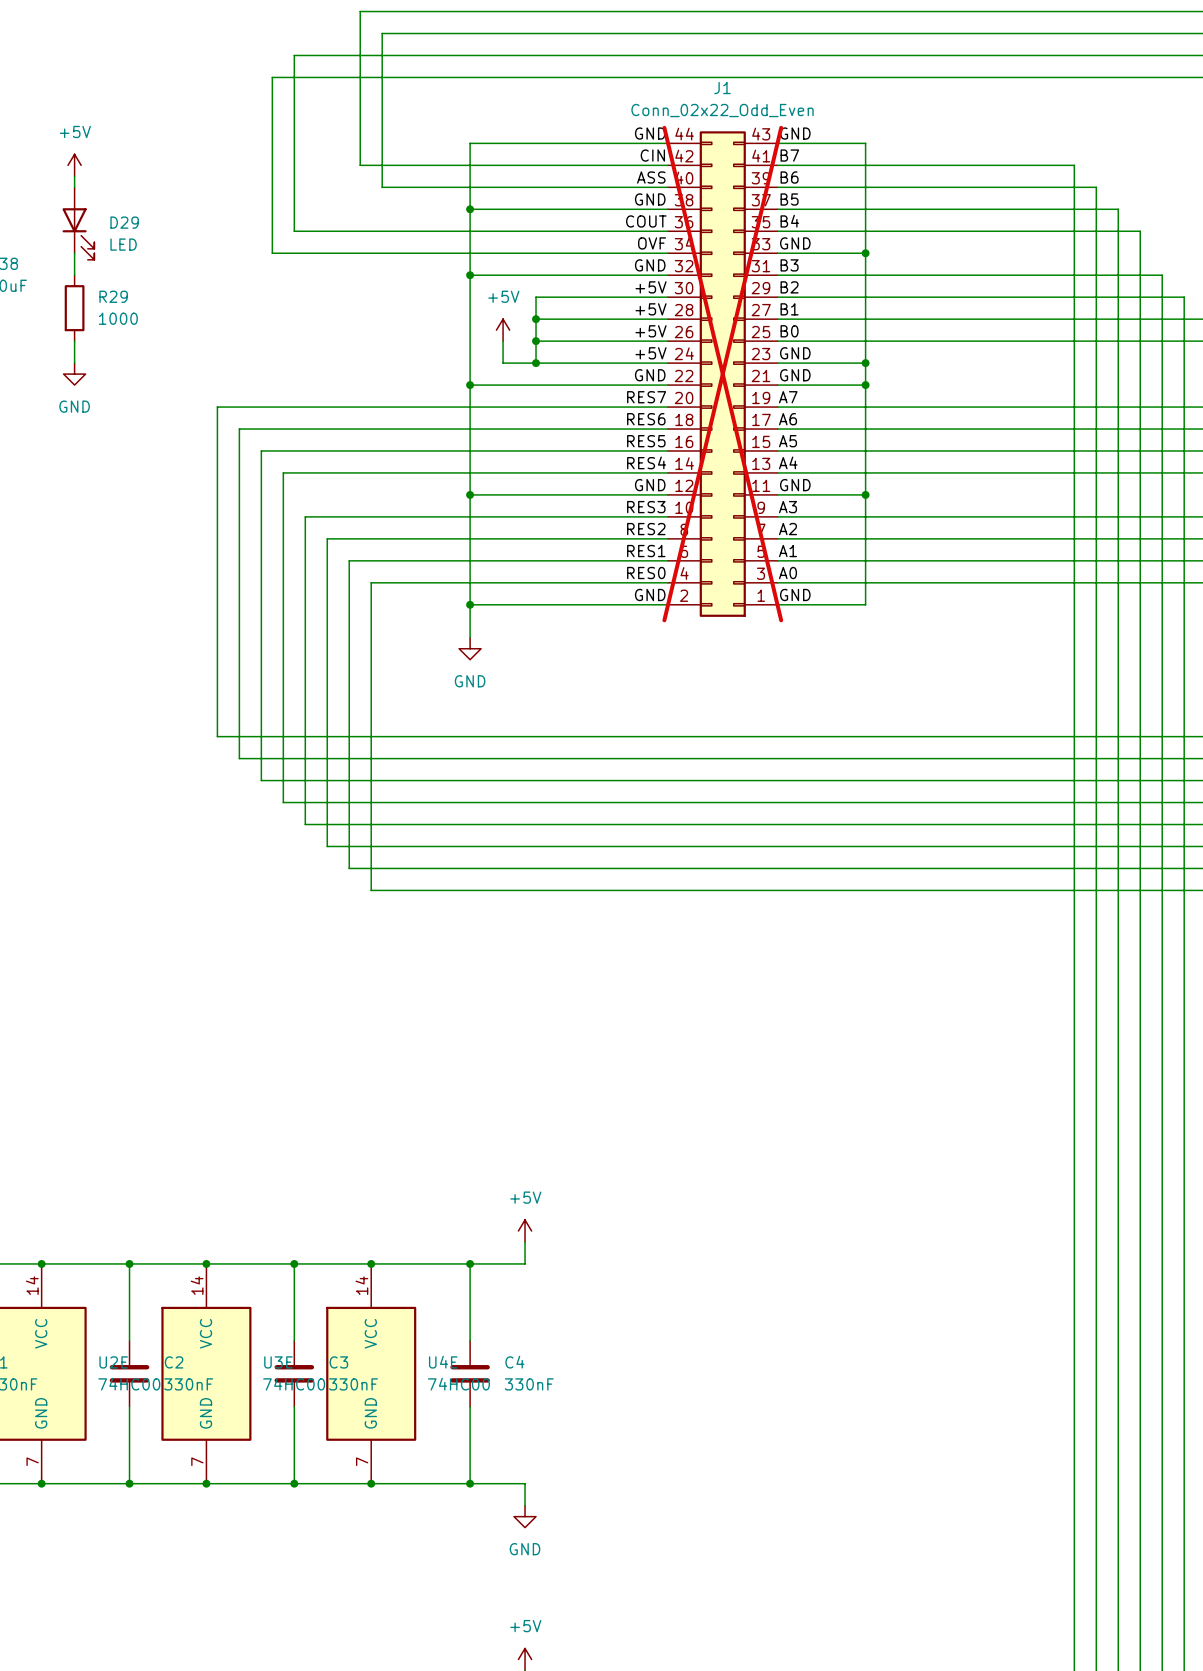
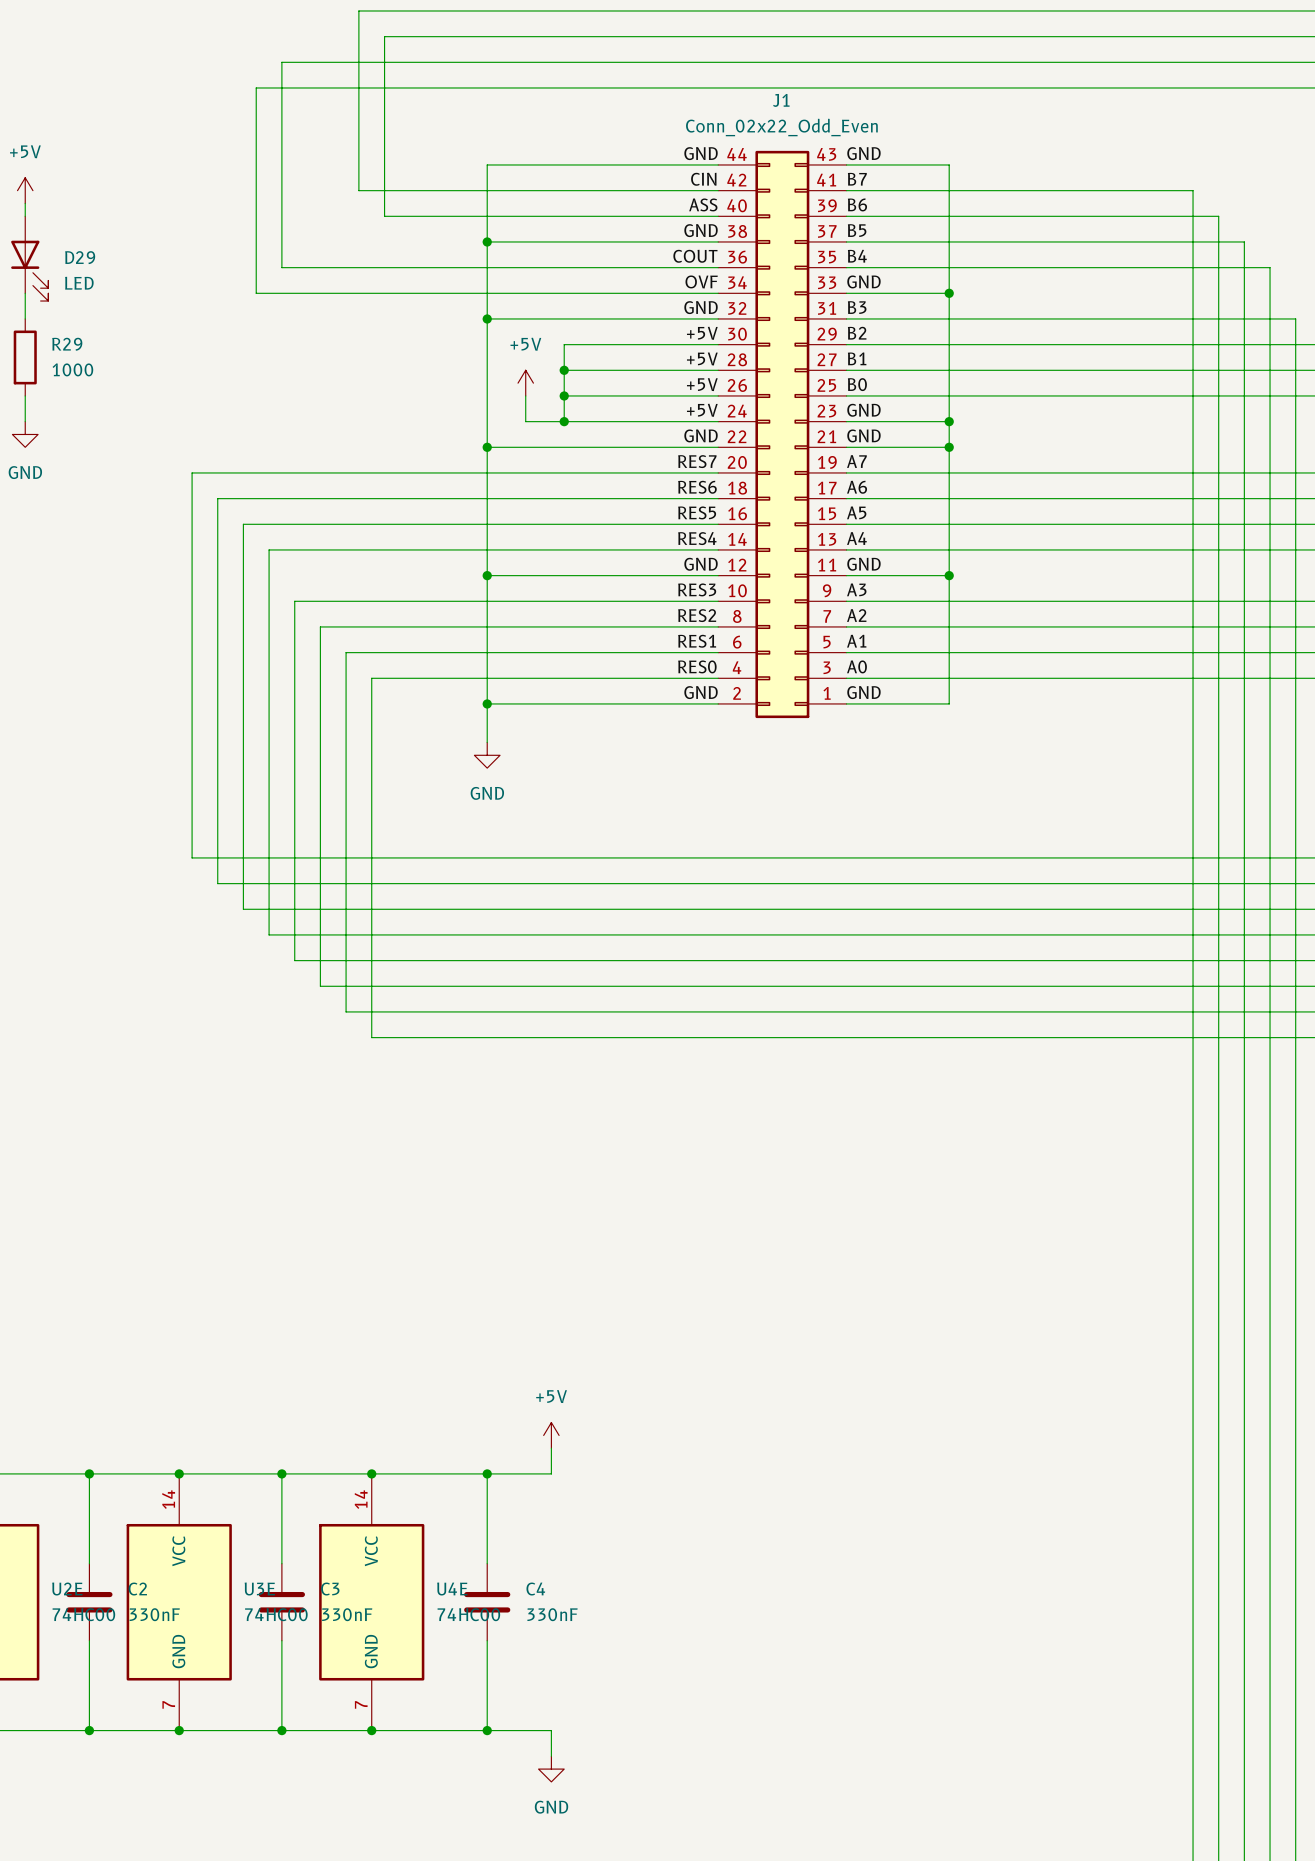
J1 do-not-place cross: (722, 374) -> none

